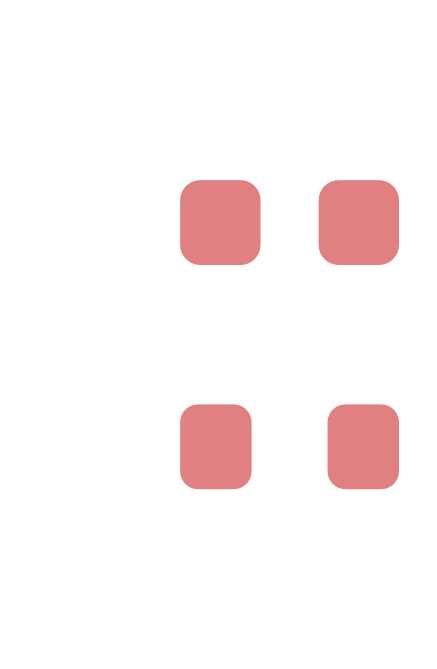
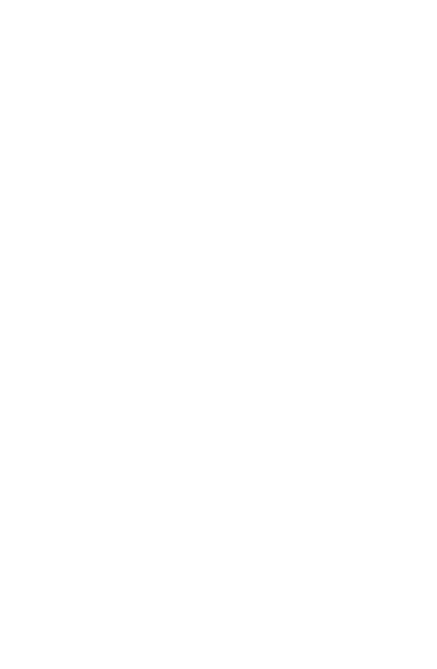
part: (289, 222) -> none
part: (289, 446) -> none

